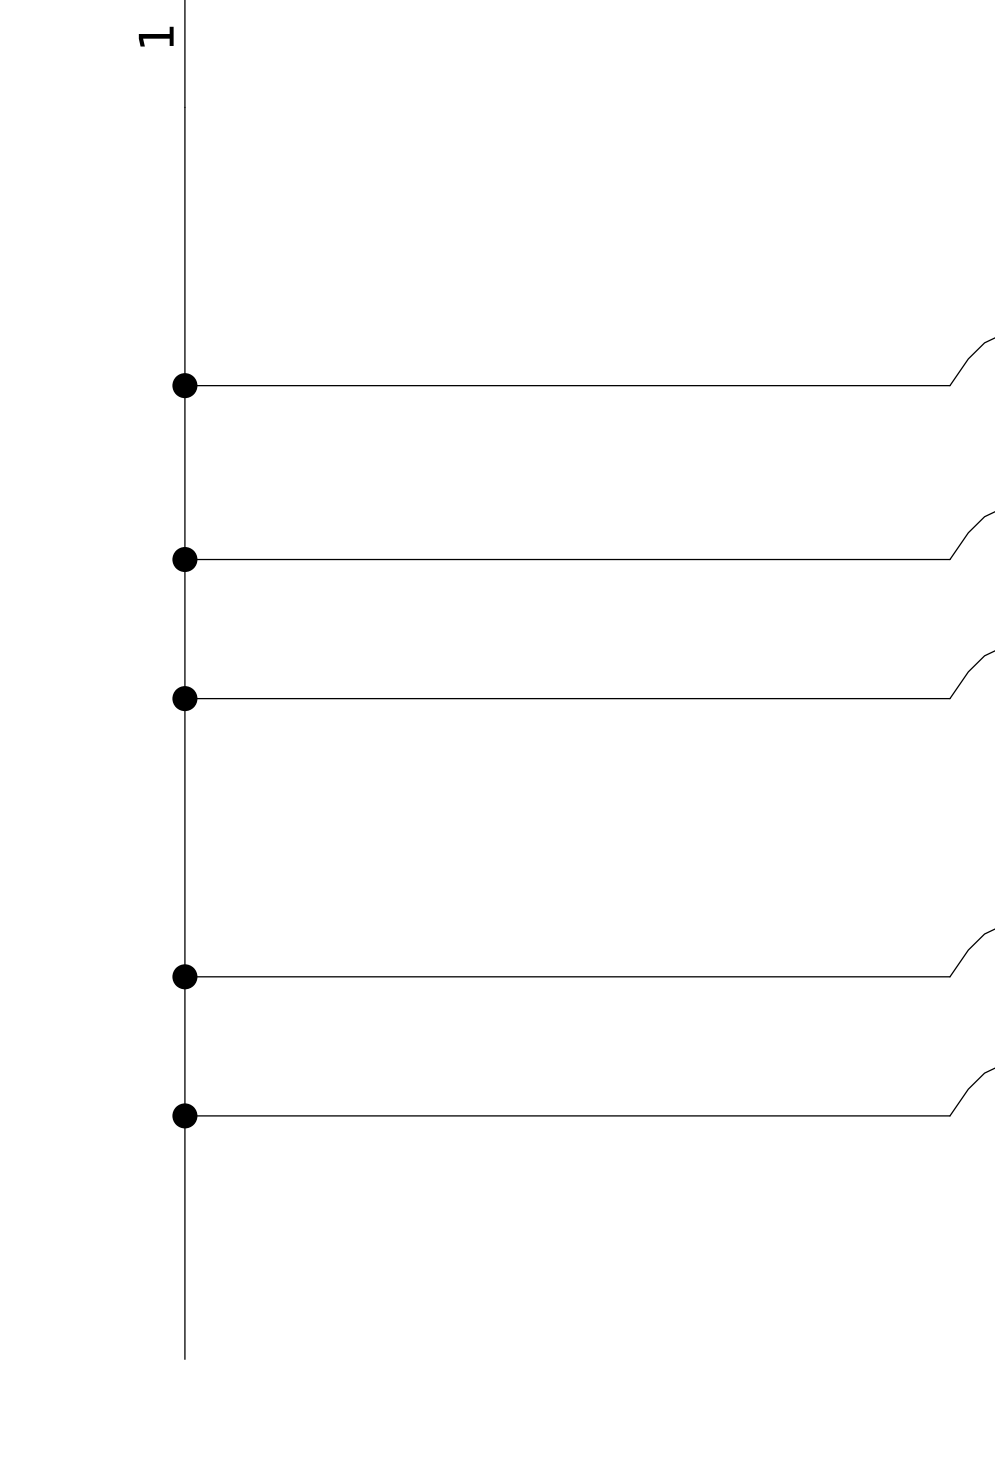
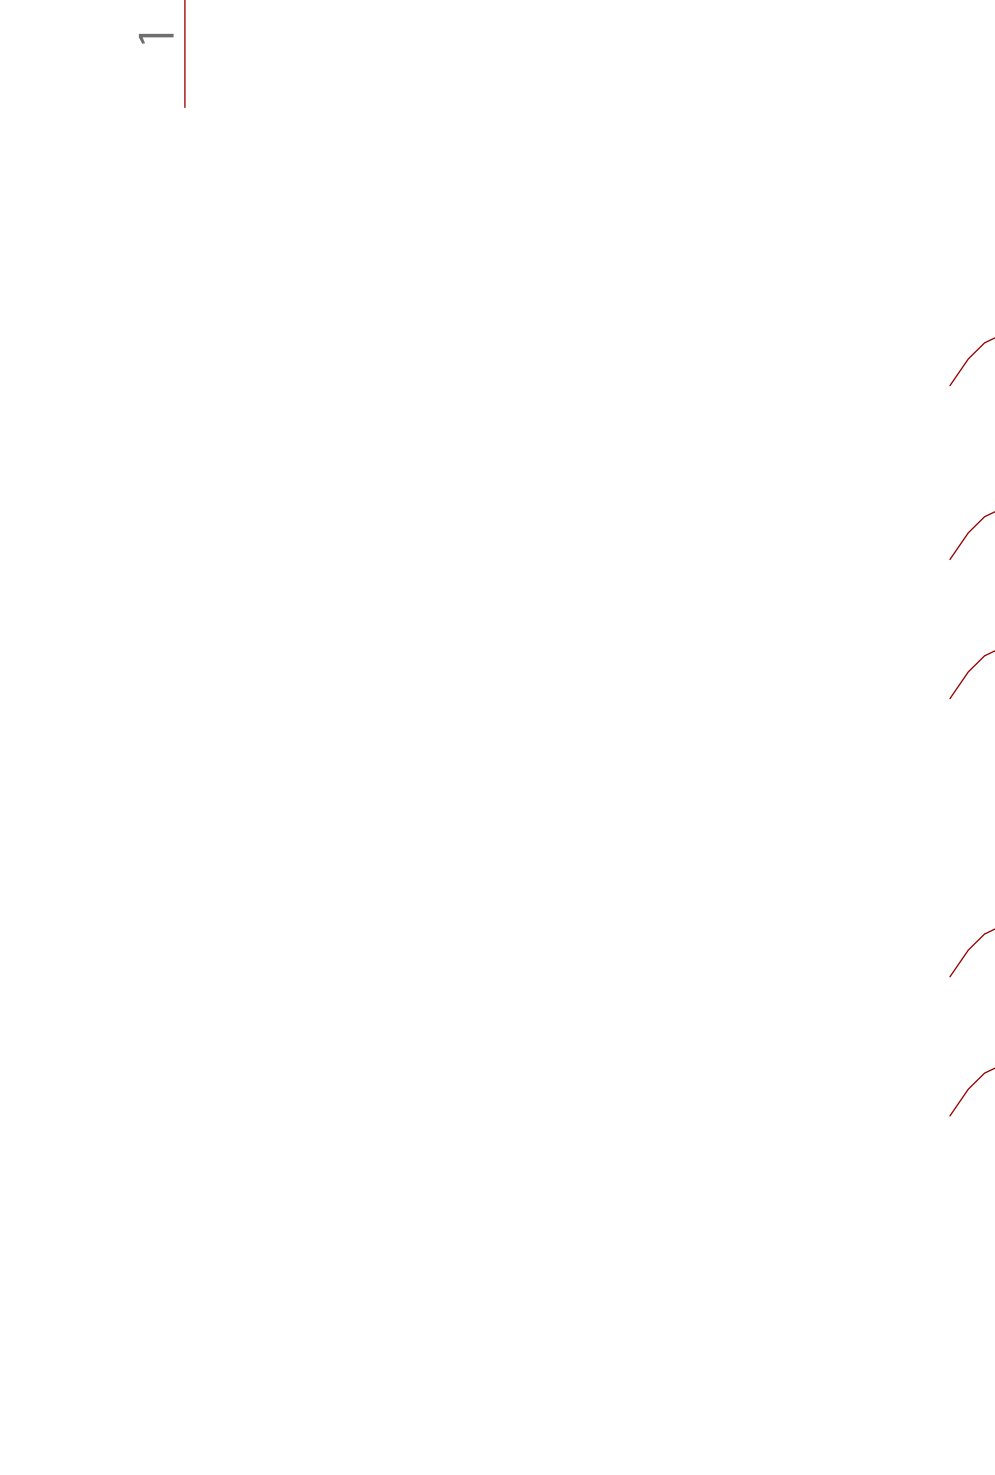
wire: (184, 107) (184, 1359) -> none
wire: (184, 385) (949, 385) -> none
junction: (184, 385) -> none
wire: (184, 559) (949, 559) -> none
junction: (184, 559) -> none
wire: (184, 698) (949, 698) -> none
junction: (184, 698) -> none
wire: (184, 976) (949, 976) -> none
junction: (184, 976) -> none
wire: (184, 1115) (949, 1115) -> none
junction: (184, 1115) -> none

